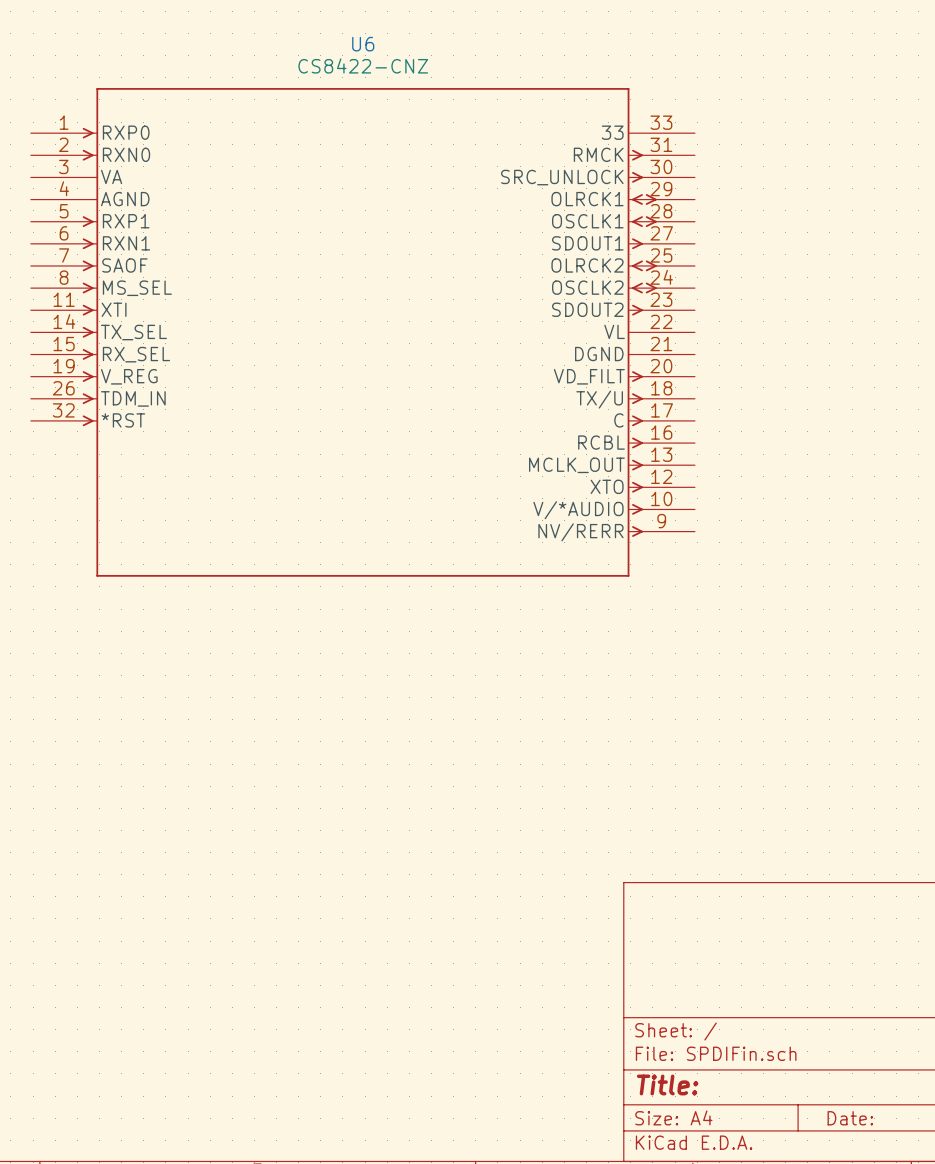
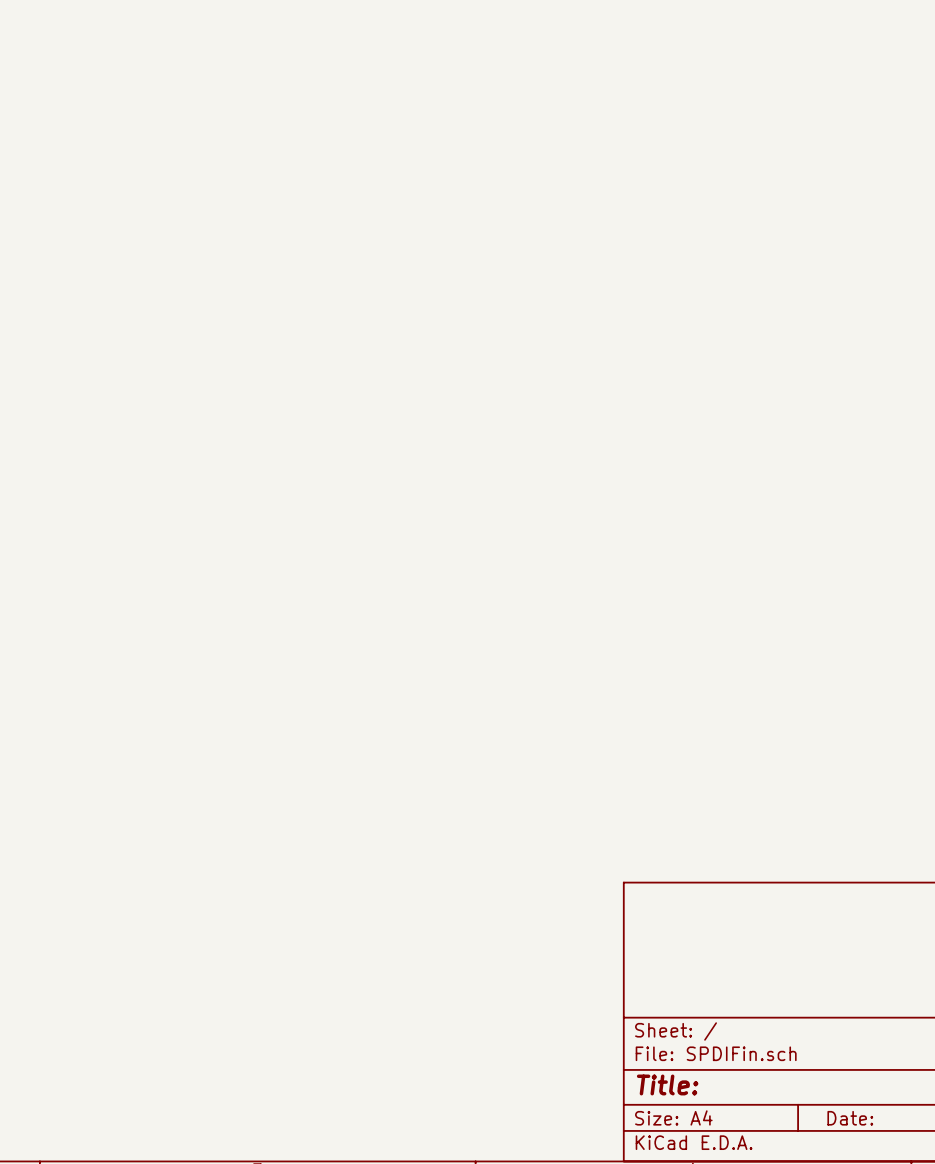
U6: CS8422-CNZ (362, 332) -> none

